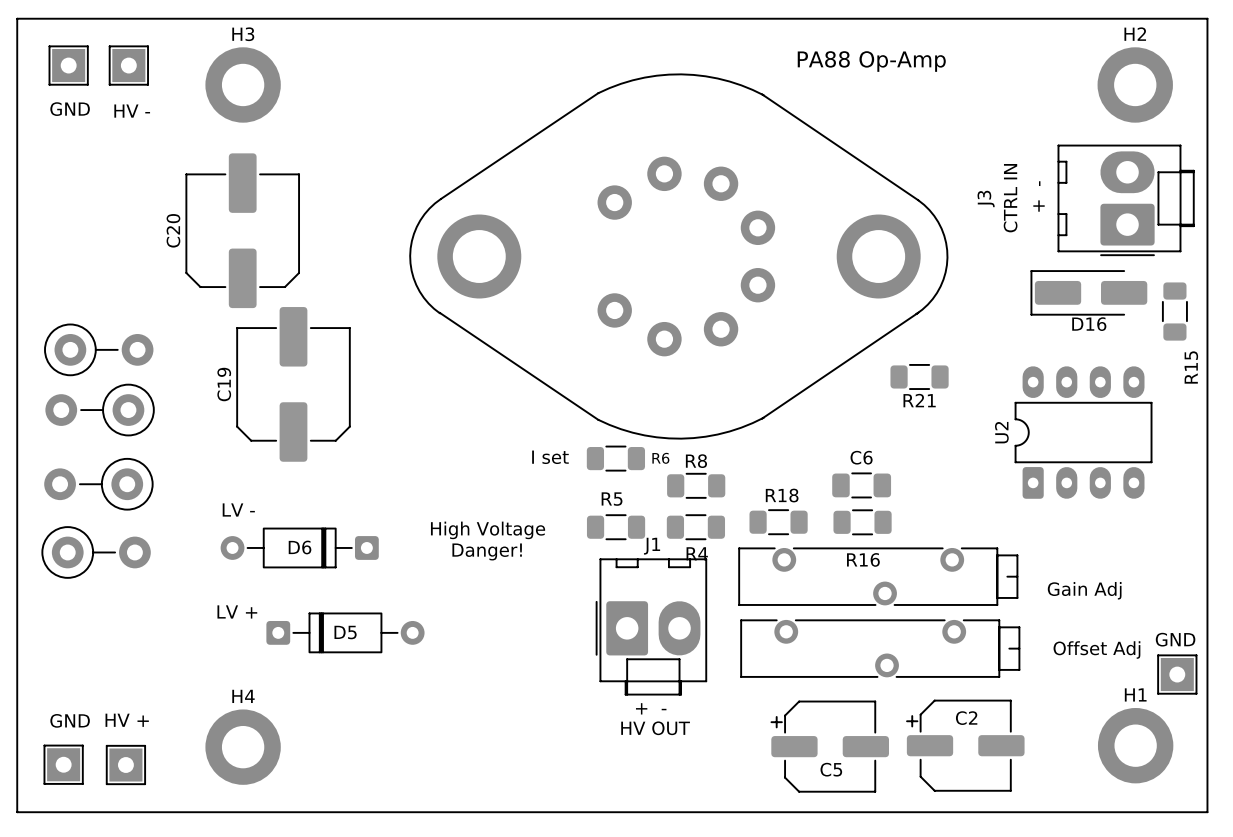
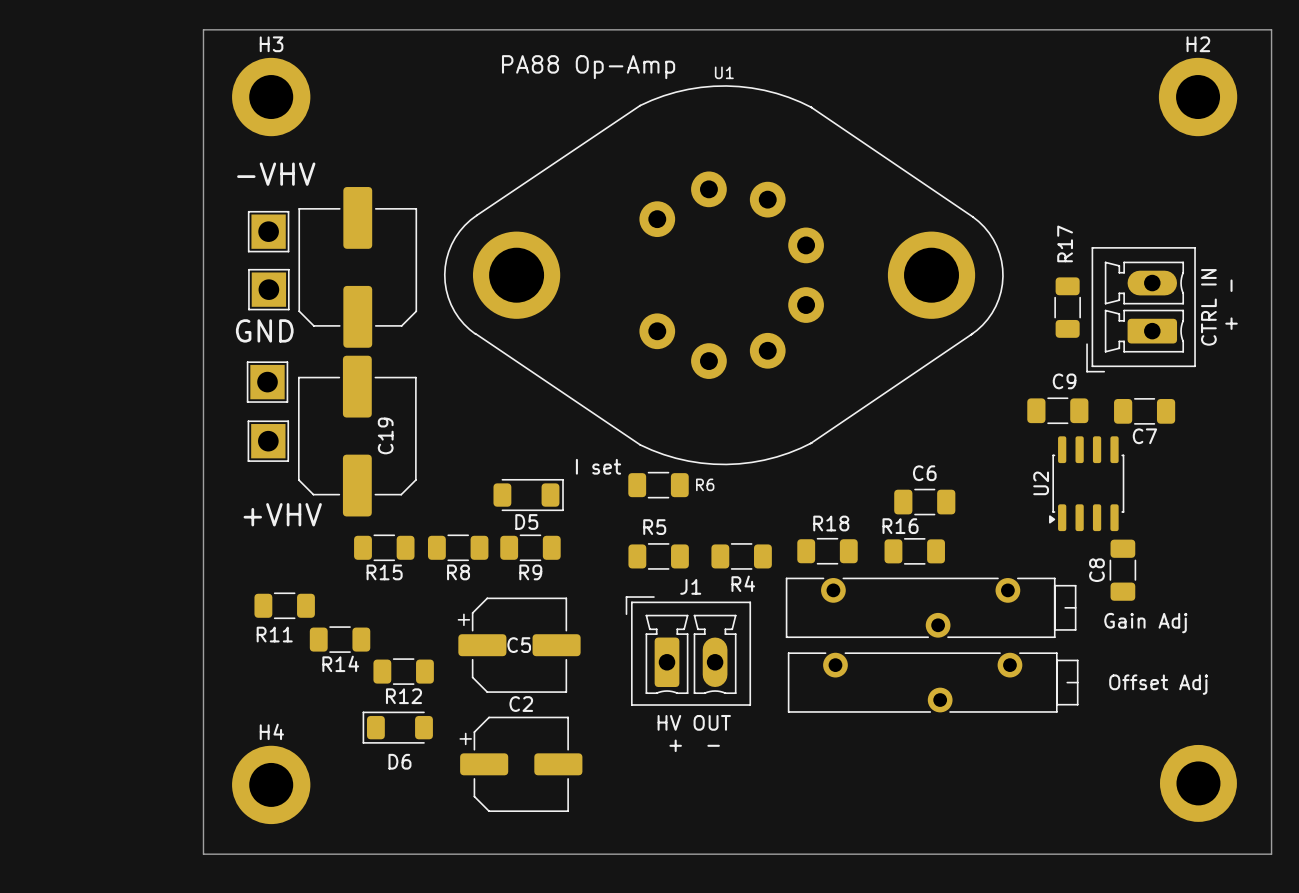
board edge: (17, 18) (1207, 18) (1207, 812) (17, 812) (17, 18) -> (203, 29) (203, 854) (1271, 854) (1271, 29) (203, 29)
U1 name: none -> U1 (724, 72)
text position: PA88 Op-Amp (871, 61) -> PA88 Op-Amp (588, 67)
part: (68, 65) -> none
part: (128, 65) -> none
text: GND (70, 109) -> none
text: HV - (132, 111) -> none
text: none -> -VHV (276, 174)
text position: + - (1039, 196) -> + - (1231, 304)
text position: CTRL IN (1010, 198) -> CTRL IN (1208, 307)
J3: (1126, 200) -> none
part: none -> (268, 231)
C20: (242, 230) -> none
part: none -> (357, 267)
part: none -> (268, 289)
R17: none -> (1067, 307)
part: none -> (1141, 309)
D16: (1088, 292) -> none
text: none -> GND (264, 330)
R15 rotation: 0° (1174, 311) -> 90° clockwise (384, 547)
R15 position: (1174, 311) -> (384, 547)
part: (98, 349) -> none
part: none -> (267, 382)
U2 footprint: [1014, 366, 1153, 499] -> [1049, 436, 1125, 532]
R15 name position: R15 (1191, 367) -> R15 (384, 572)
R21: (919, 376) -> none
C19 name position: C19 (224, 384) -> C19 (385, 435)
C19 position: (293, 384) -> (357, 436)
C9: none -> (1057, 410)
C7: none -> (1144, 411)
part: (100, 410) -> none
part: none -> (268, 441)
U2 name position: U2 (1001, 432) -> U2 (1041, 483)
text position: I set (550, 457) -> I set (598, 466)
R8 name position: R8 (696, 461) -> R8 (458, 572)
part: (98, 484) -> none
R8 position: (696, 485) -> (458, 547)
C6 position: (861, 485) -> (924, 502)
text: none -> +VHV (282, 514)
text: LV - (238, 509) -> none
R9: none -> (530, 547)
D6 footprint: [220, 527, 379, 569] -> [362, 711, 433, 744]
text: High Voltage (488, 530) -> none
C8: none -> (1122, 570)
D6 name position: D6 (300, 547) -> D6 (399, 761)
text: Danger! (487, 551) -> none
part: (96, 552) -> none
J1 footprint: [595, 558, 708, 696] -> [625, 596, 752, 706]
R16 name position: R16 (863, 559) -> R16 (900, 526)
R11: none -> (284, 605)
R14: none -> (340, 639)
text: LV + (237, 611) -> none
D5 footprint: [266, 612, 425, 654] -> [493, 478, 564, 512]
D5 name position: D5 (345, 632) -> D5 (526, 522)
R12: none -> (403, 671)
text: GND (1175, 639) -> none
part: (1177, 674) -> none
C5 footprint: [770, 700, 890, 793] -> [457, 597, 581, 693]
C2 name position: C2 (966, 718) -> C2 (521, 704)
text: GND (70, 720) -> none
text: HV + (127, 720) -> none
text position: HV OUT (655, 728) -> HV OUT (694, 722)
C2 position: (965, 745) -> (520, 764)
H1: (1135, 745) -> none
part: none -> (1198, 783)
part: (63, 764) -> none
part: (125, 765) -> none

